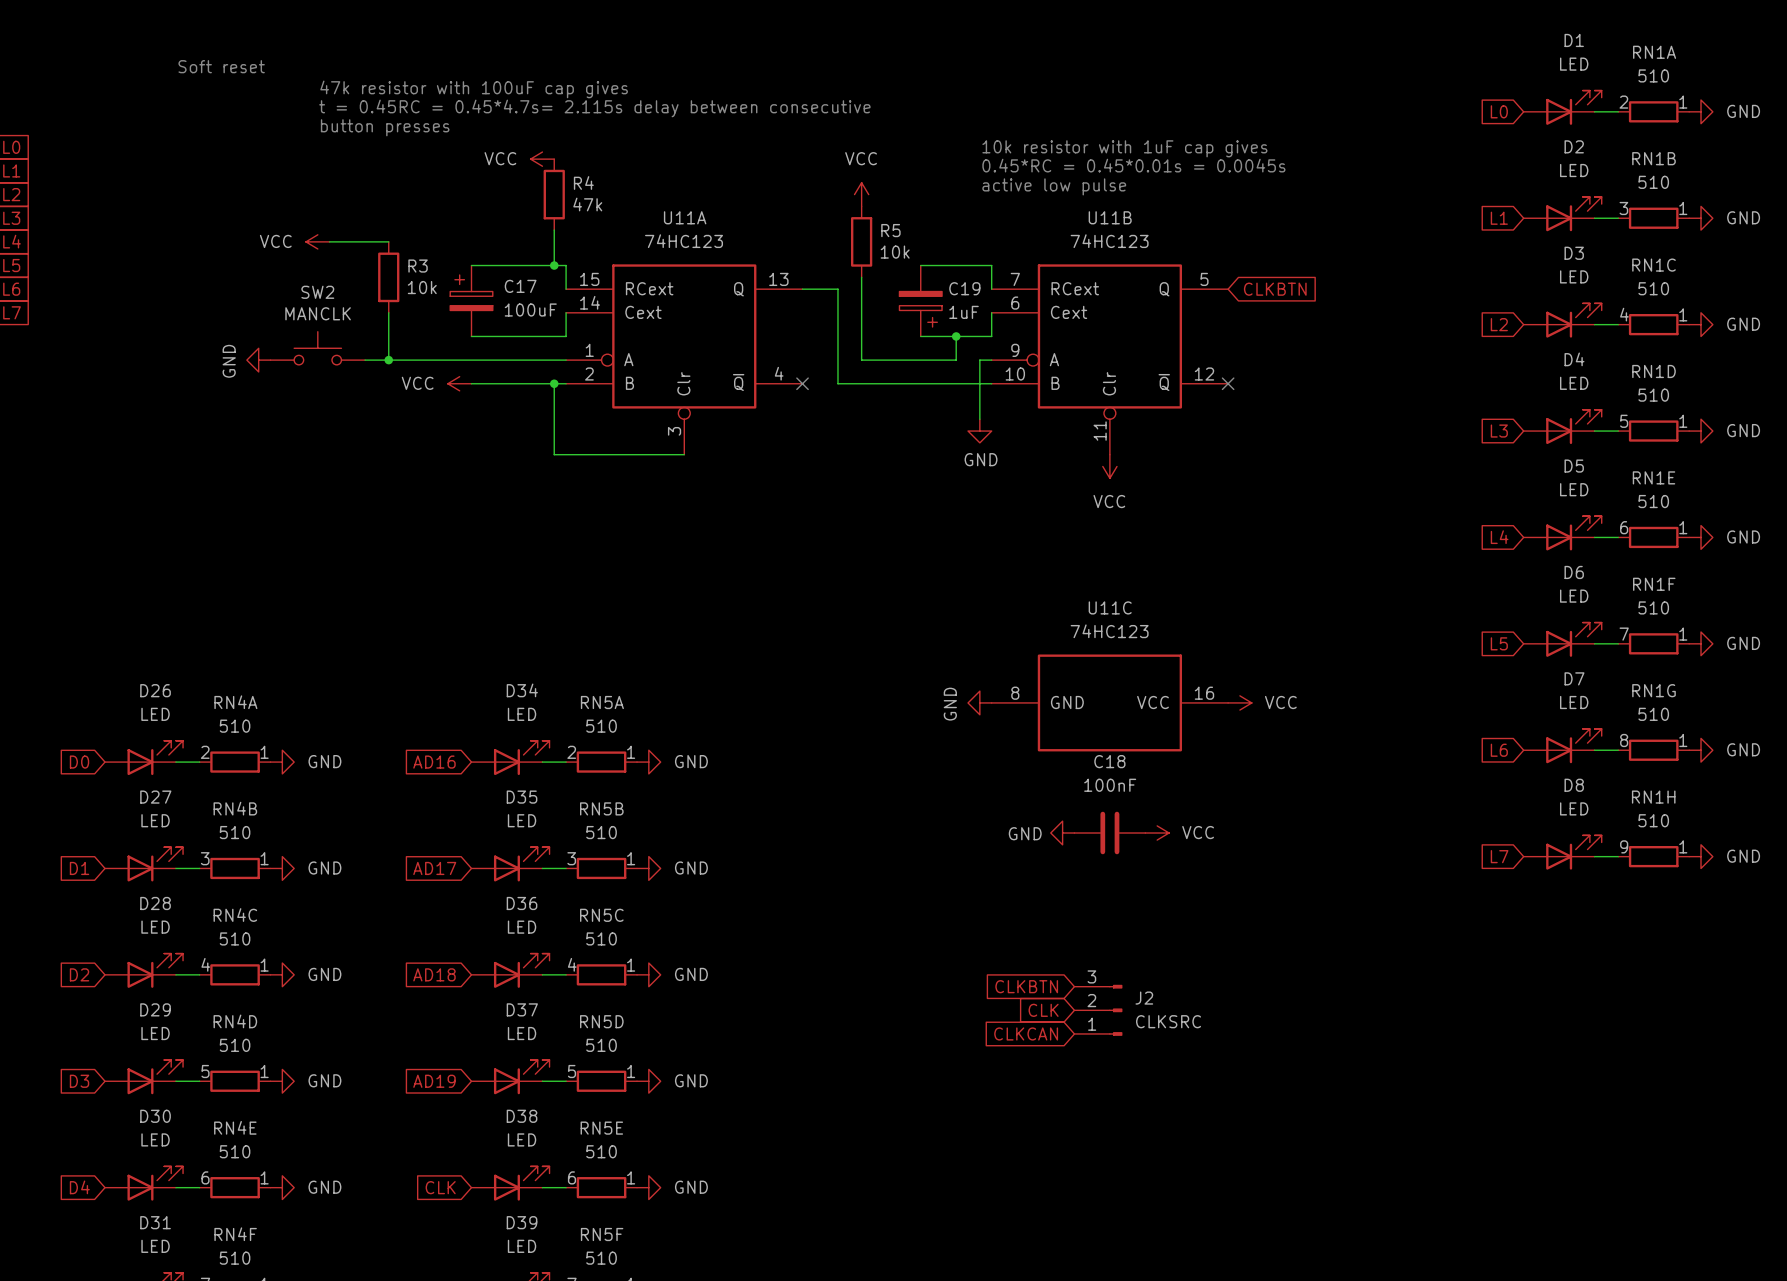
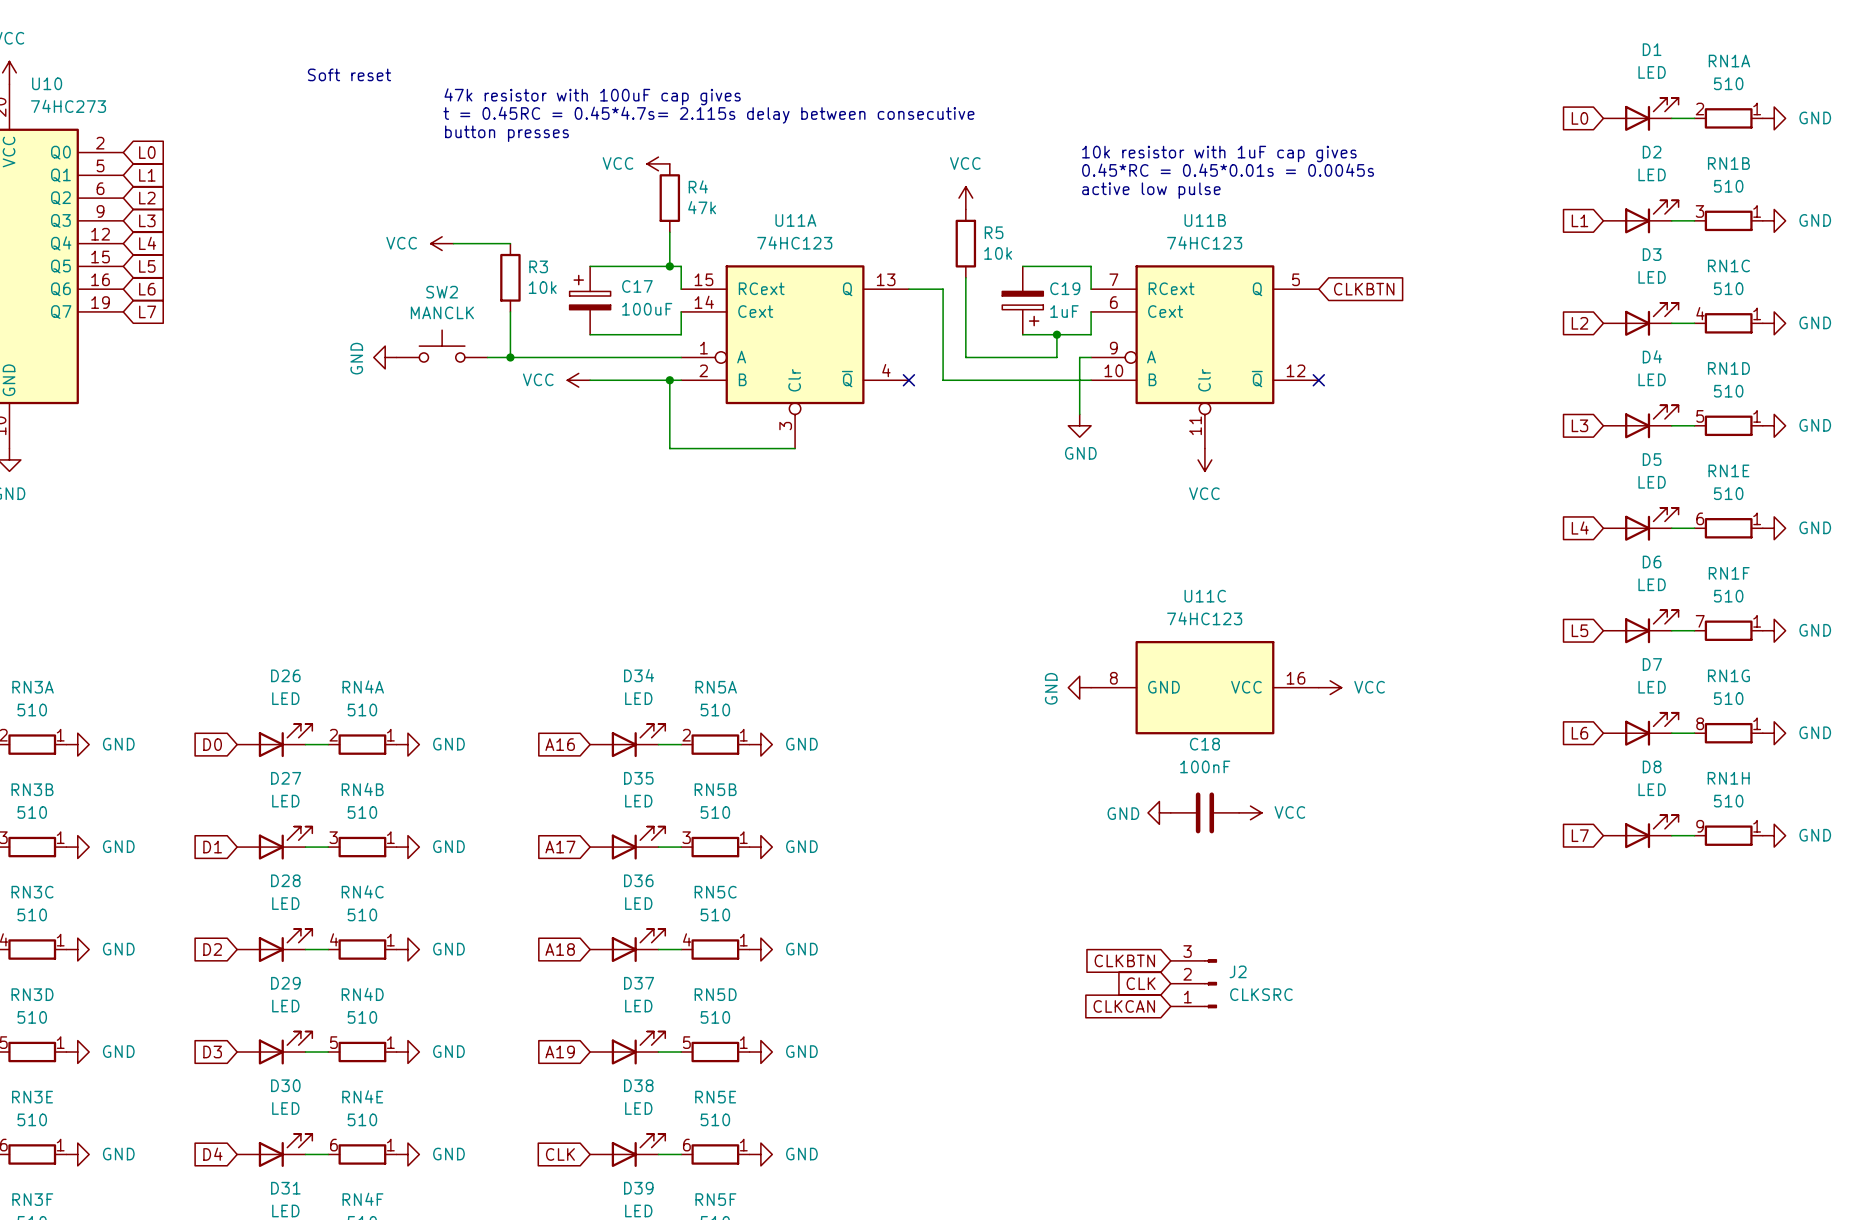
global label: AD16 (434, 762) -> A16 (560, 744)
global label: AD17 (434, 868) -> A17 (560, 847)
global label: AD18 (434, 974) -> A18 (560, 949)
global label: AD19 (434, 1081) -> A19 (560, 1052)

